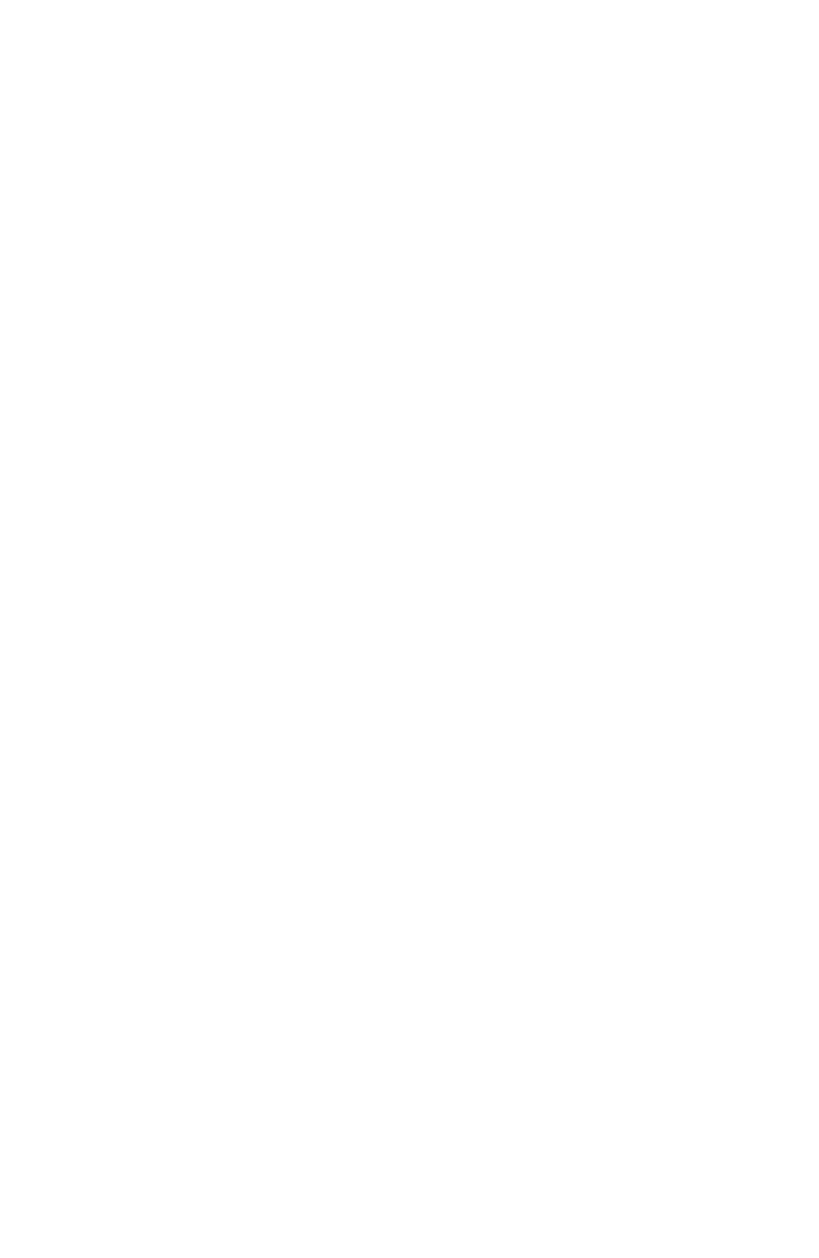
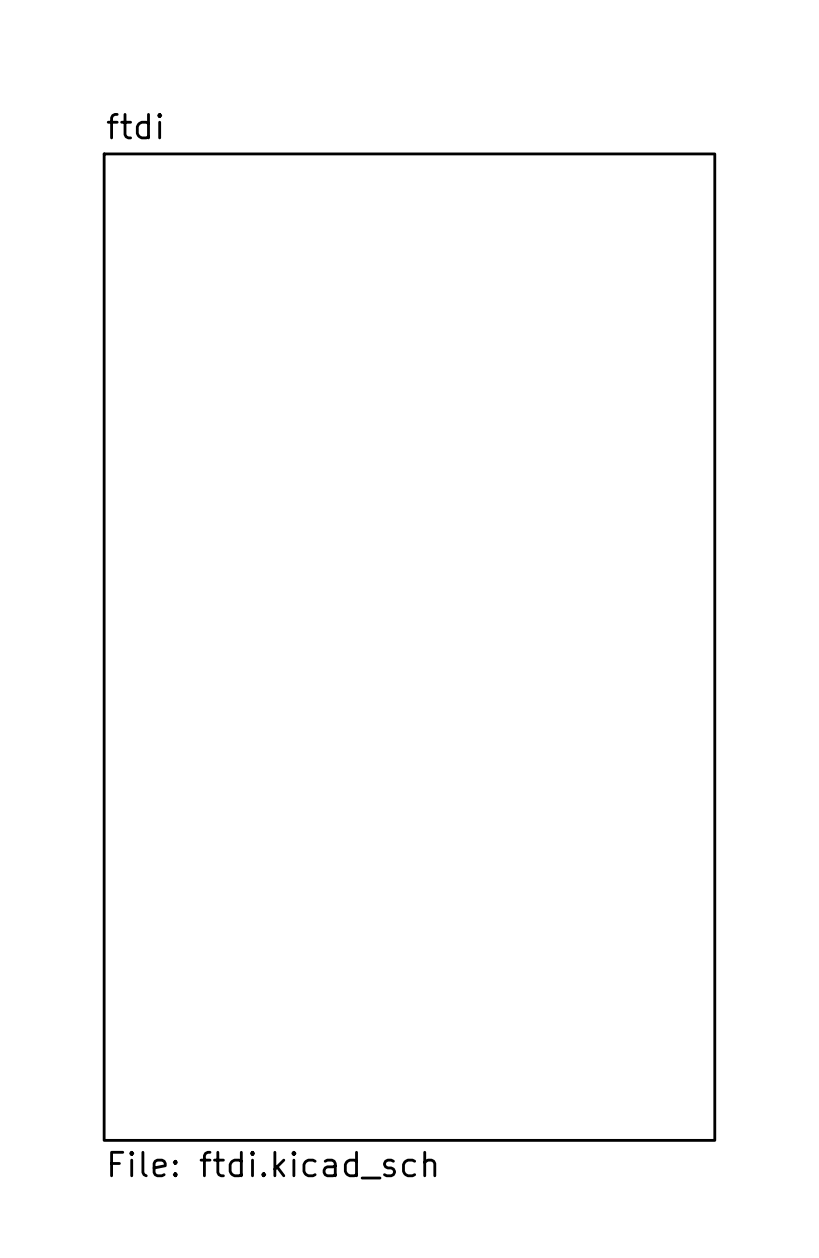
sheet ftdi: none -> File: ftdi.kicad_sch (409, 647)

